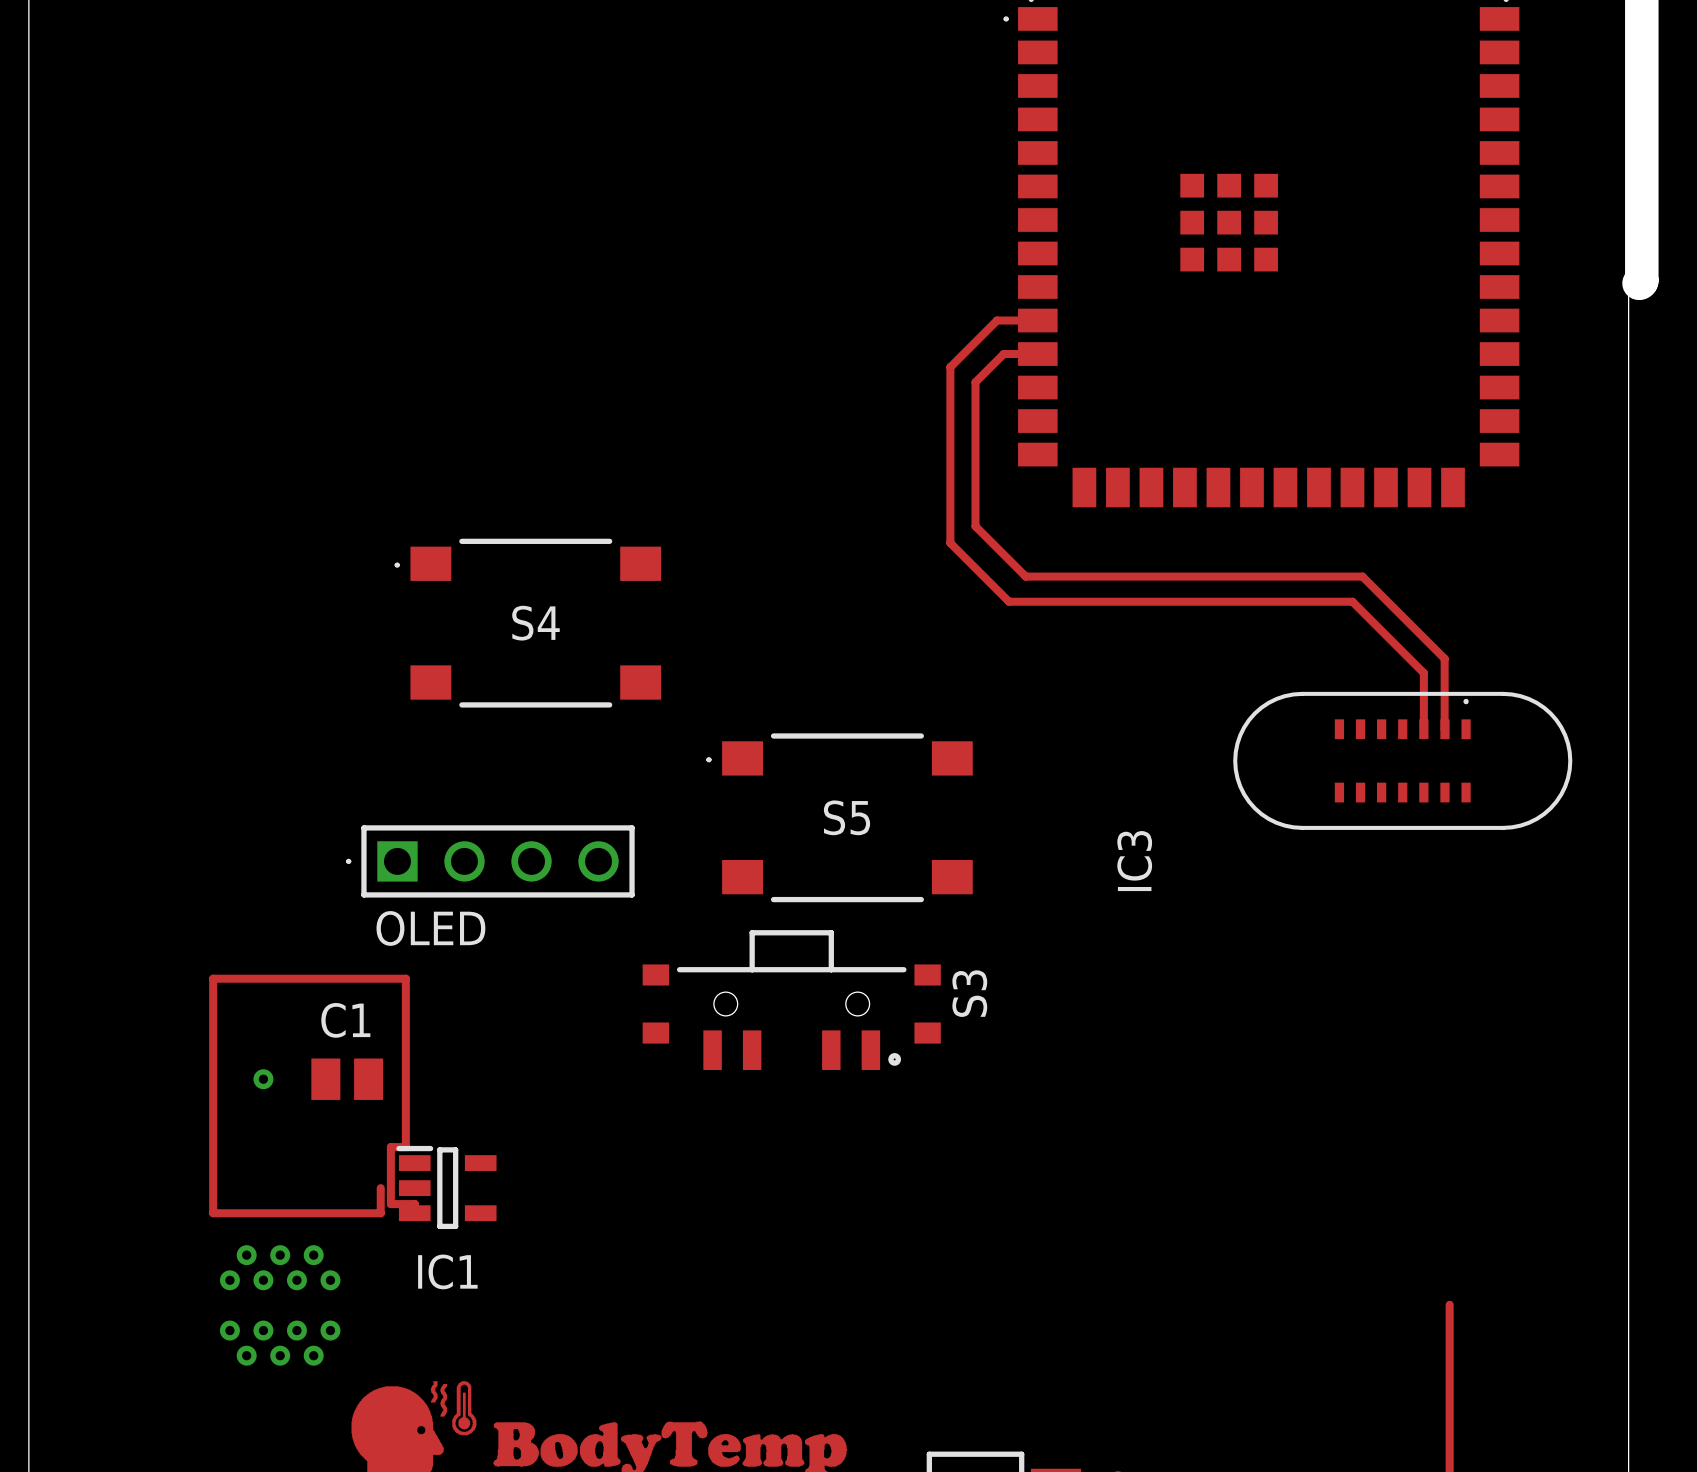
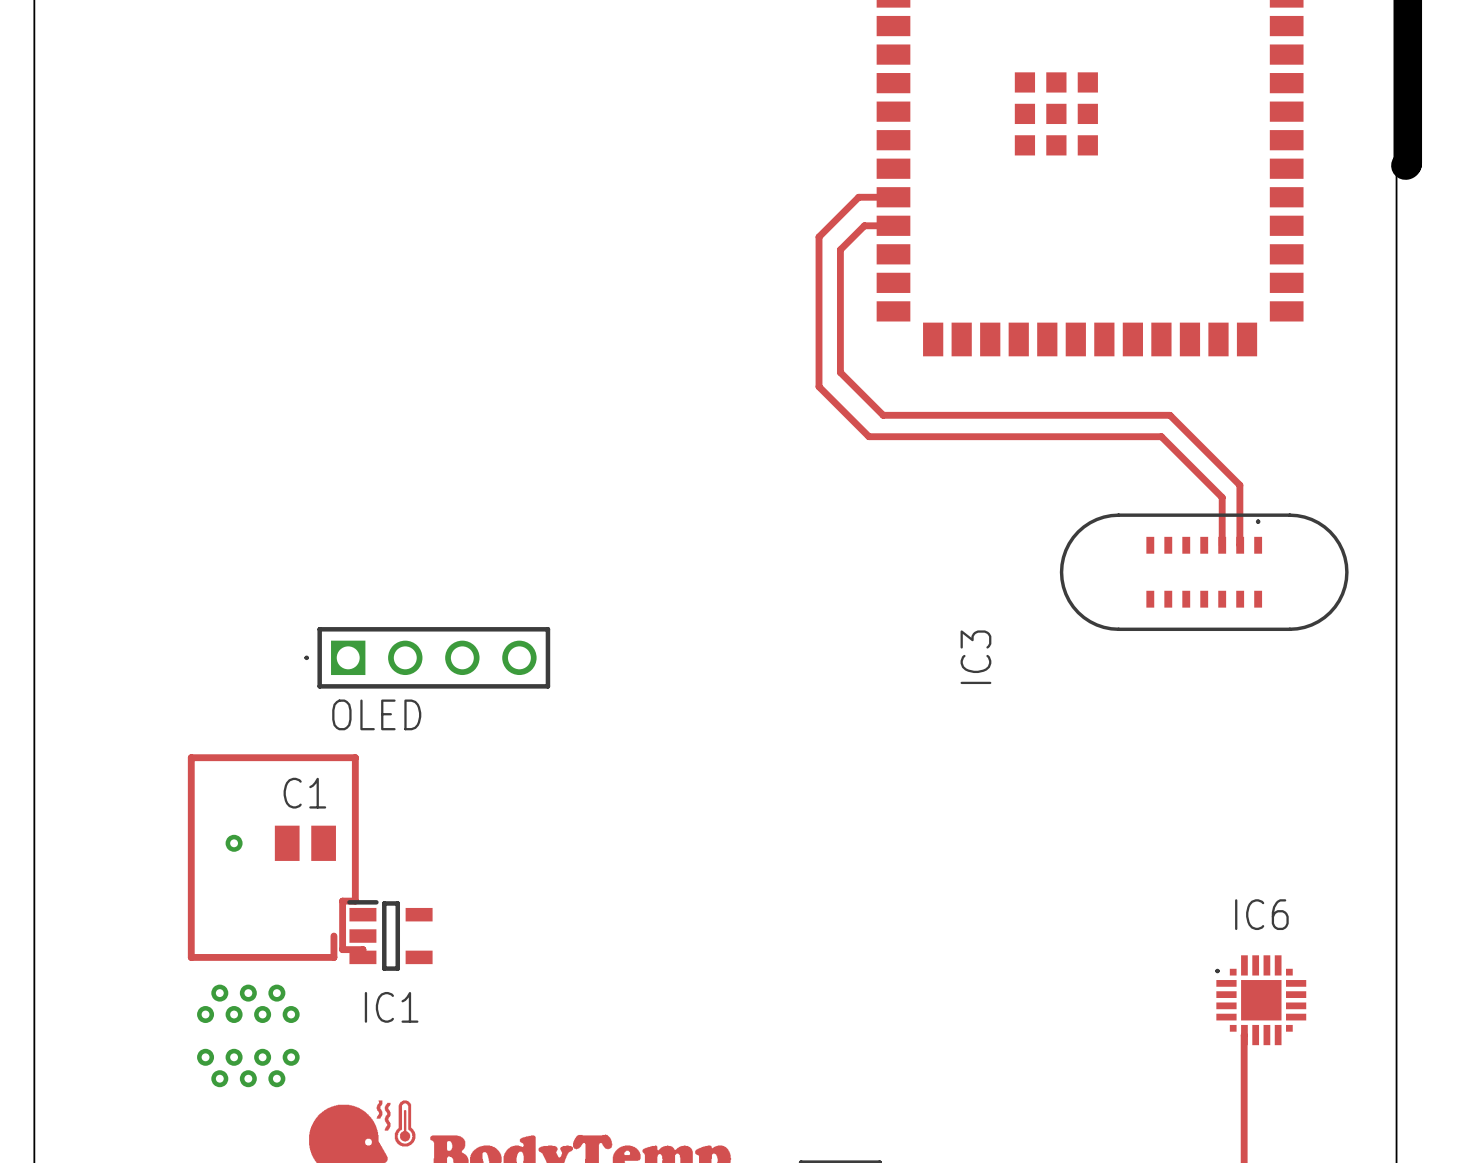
S4: (527, 623) -> none
S5: (839, 817) -> none
S3: (791, 1000) -> none
IC6: none -> (1260, 1000)

